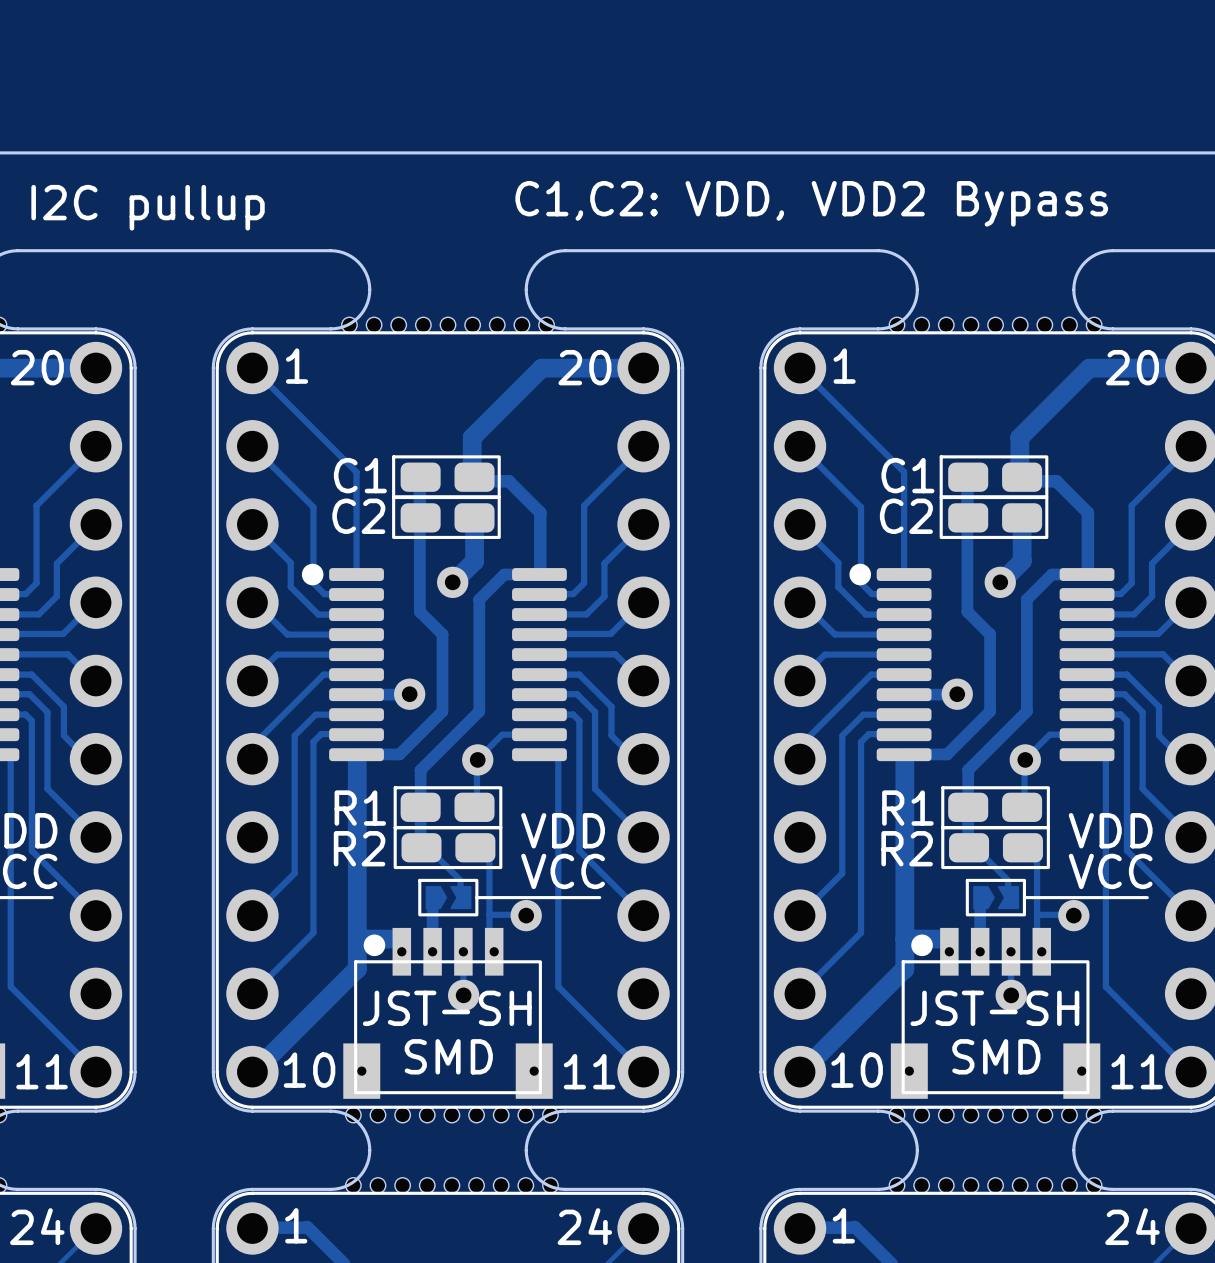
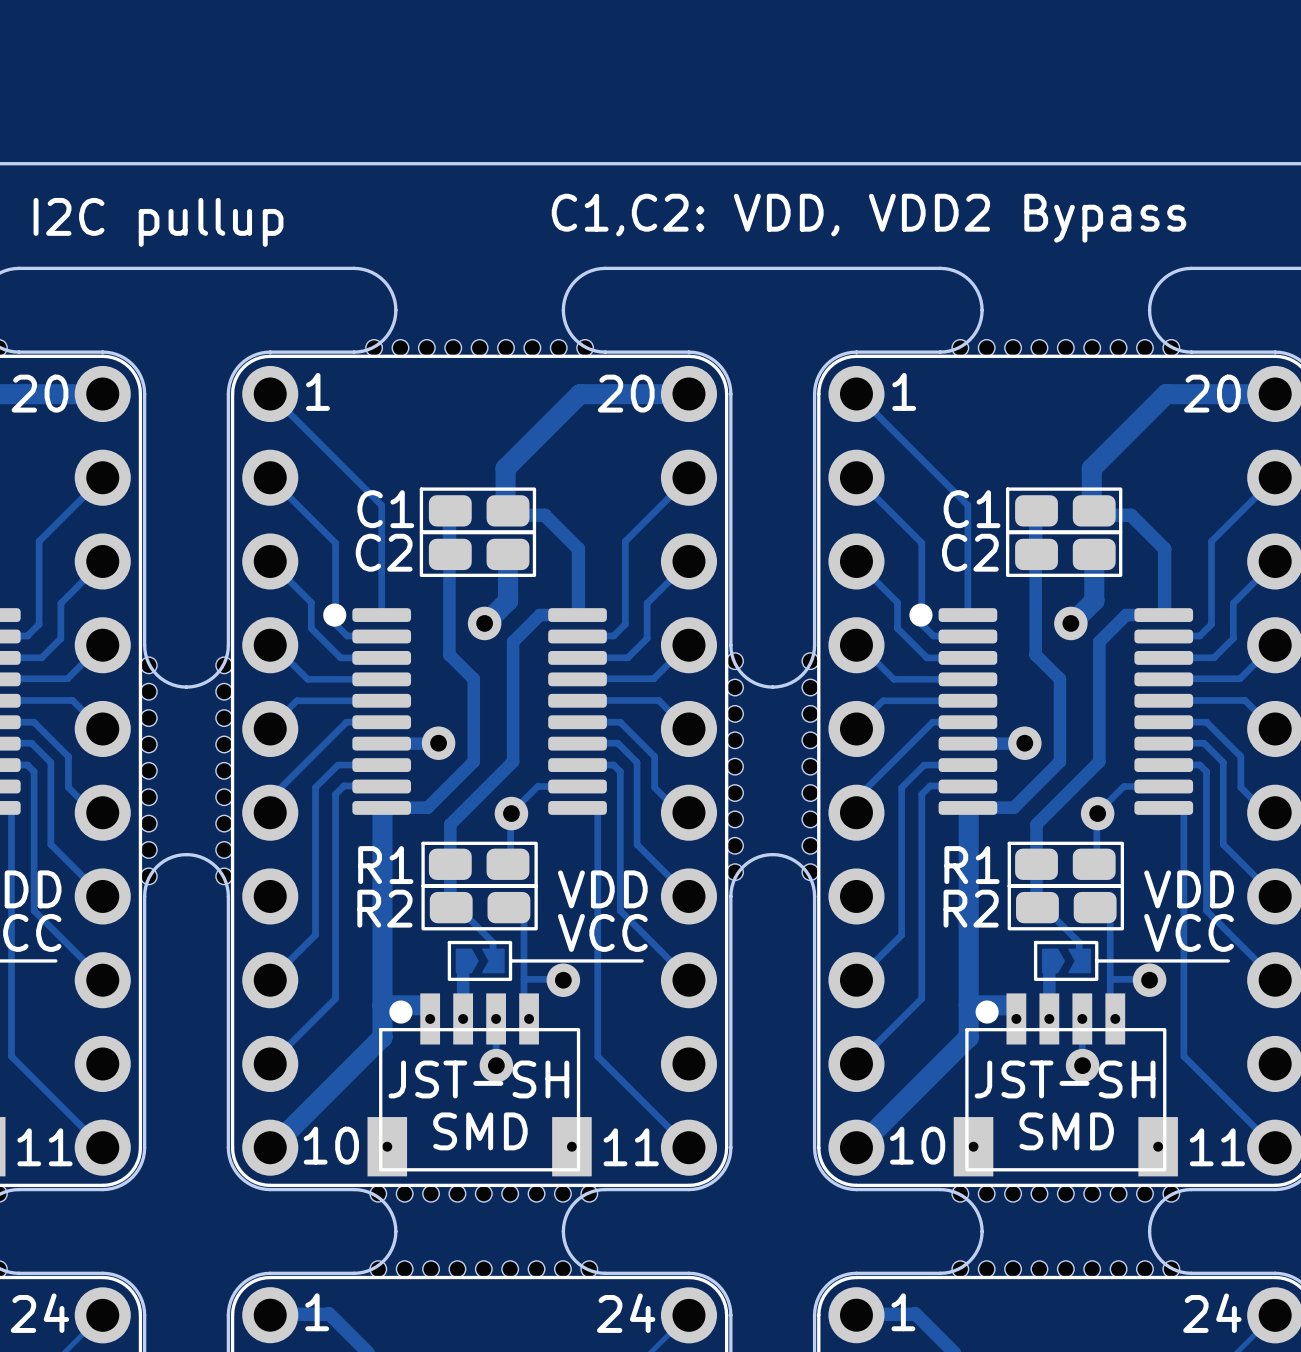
board edge: (135, 602) (135, 837) -> (144, 645) (146, 659) (156, 674) (172, 684) (186, 687) (204, 682) (216, 674) (226, 659) (228, 645)
board edge: (213, 602) (213, 837) -> (144, 896) (148, 878) (156, 866) (168, 858) (186, 854) (200, 856) (216, 866) (224, 878) (228, 896)
board edge: (682, 602) (682, 837) -> (730, 645) (735, 663) (743, 674) (758, 684) (772, 687) (790, 682) (802, 674) (810, 663) (814, 645)
board edge: (760, 602) (760, 837) -> (730, 896) (733, 882) (743, 866) (758, 856) (772, 854) (790, 858) (802, 866) (812, 882) (814, 896)
part: none -> (772, 766)
part: none -> (186, 770)

